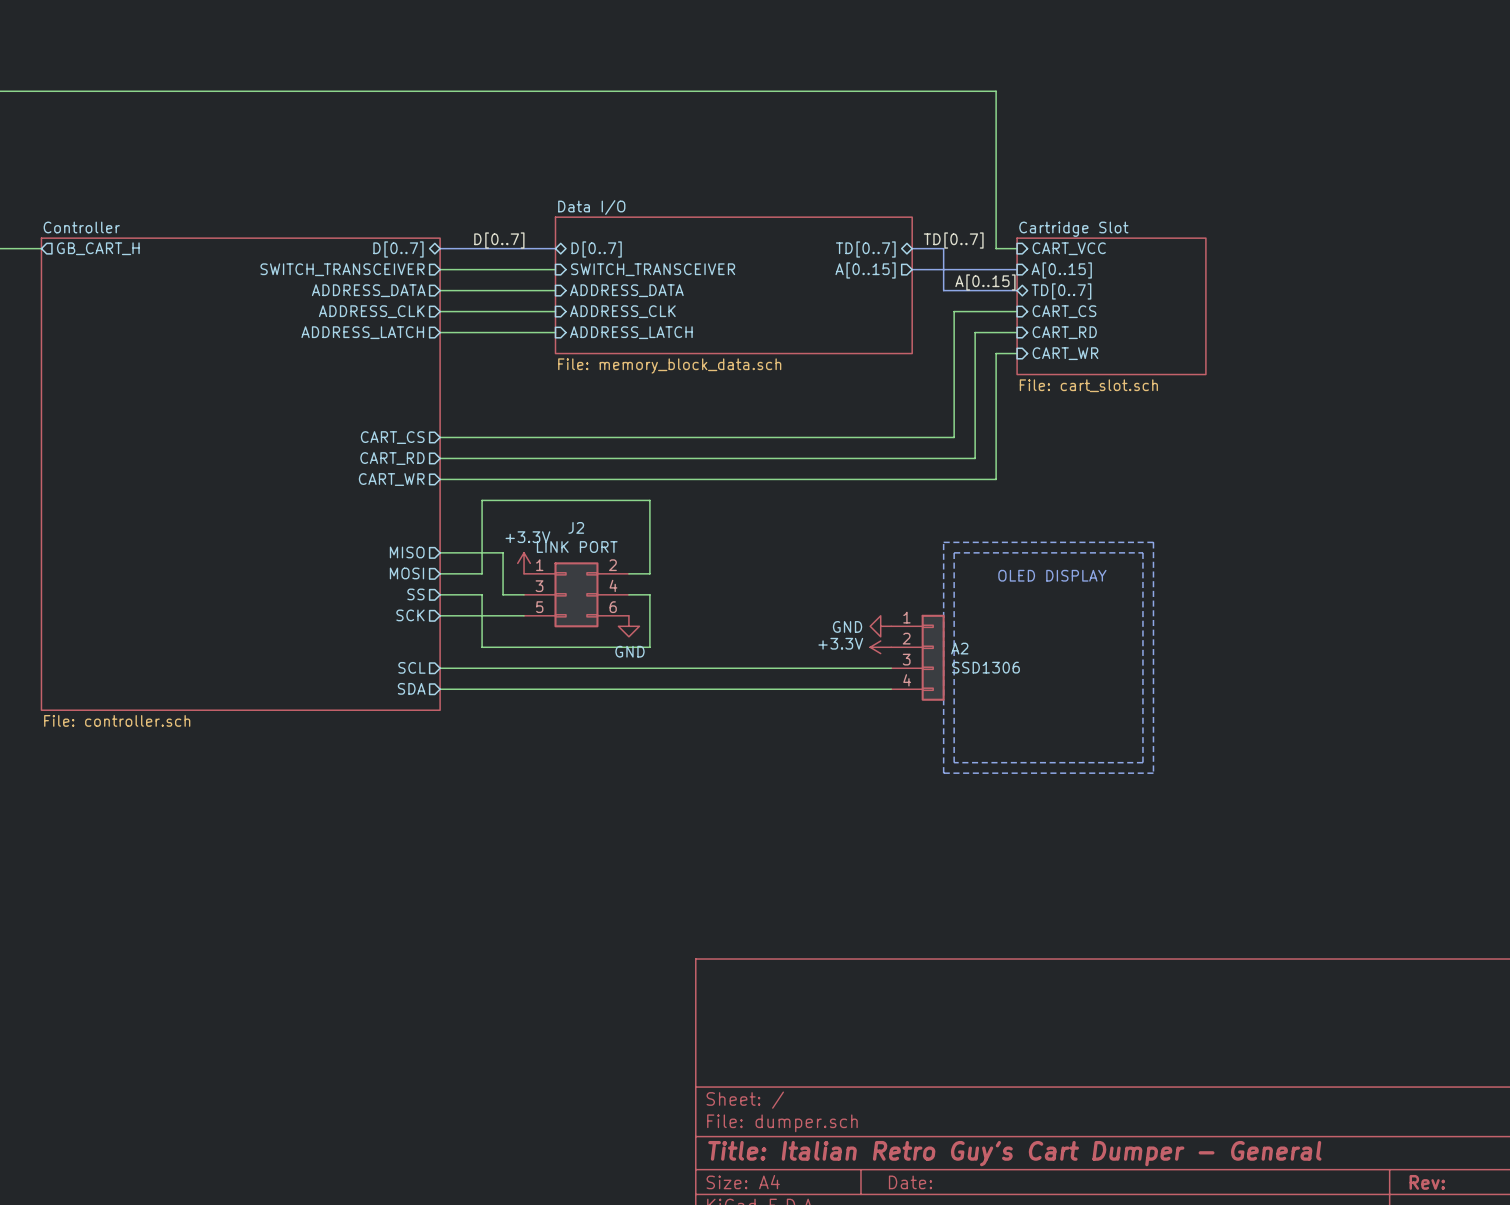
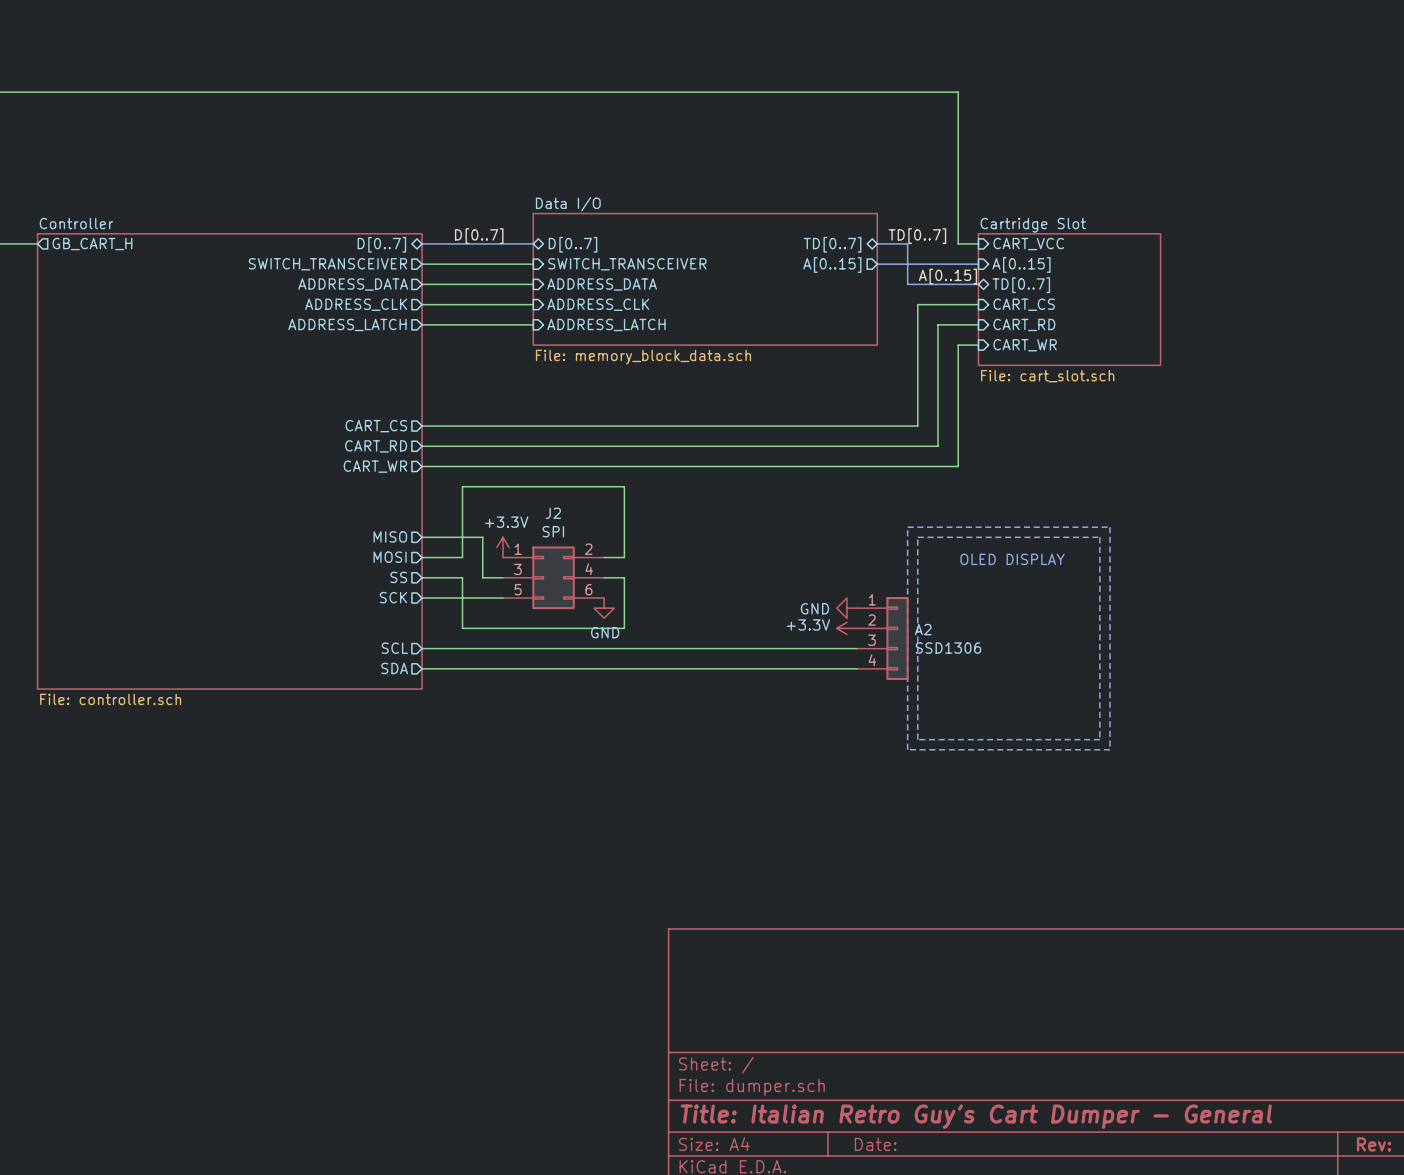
J2 value: LINK PORT (577, 547) -> SPI (553, 531)

